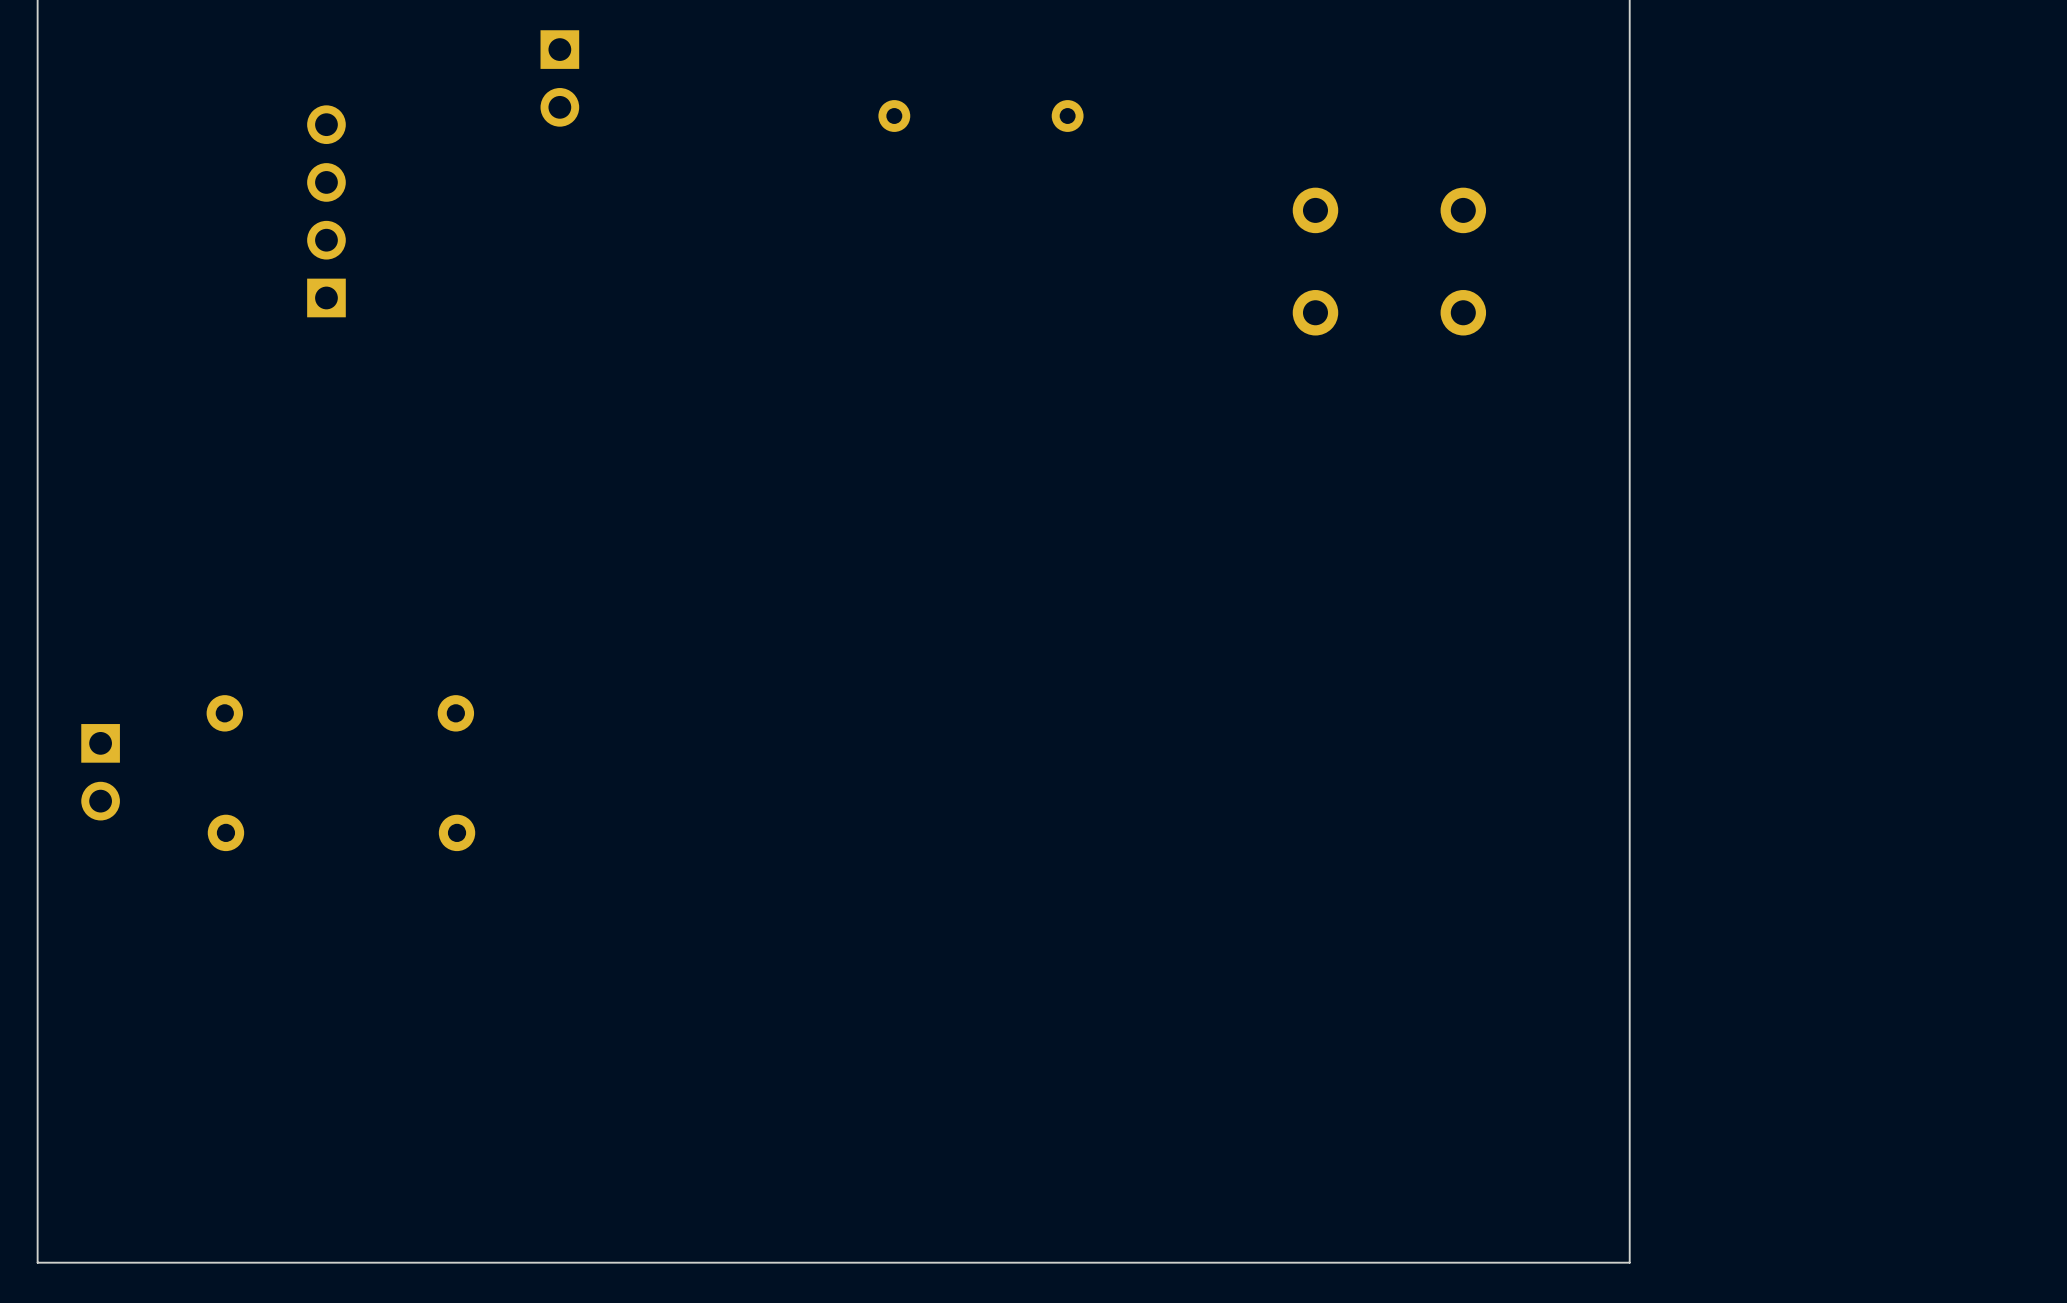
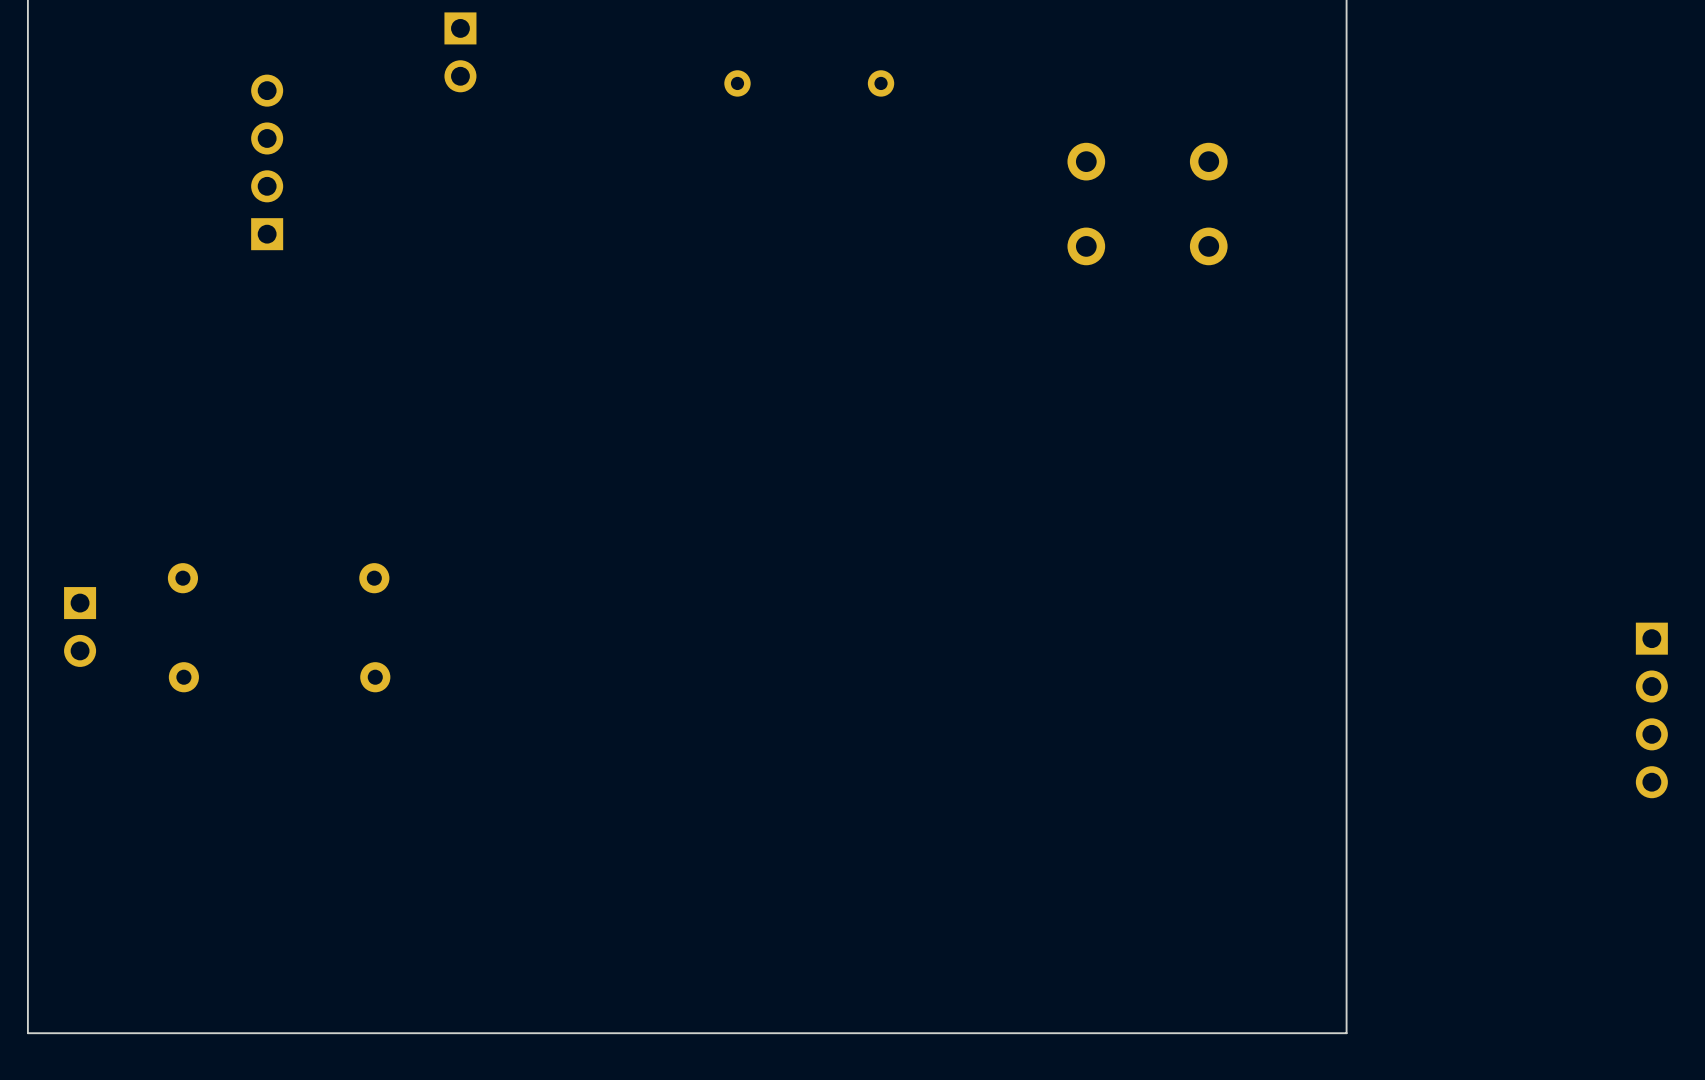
part: none -> (1651, 710)

